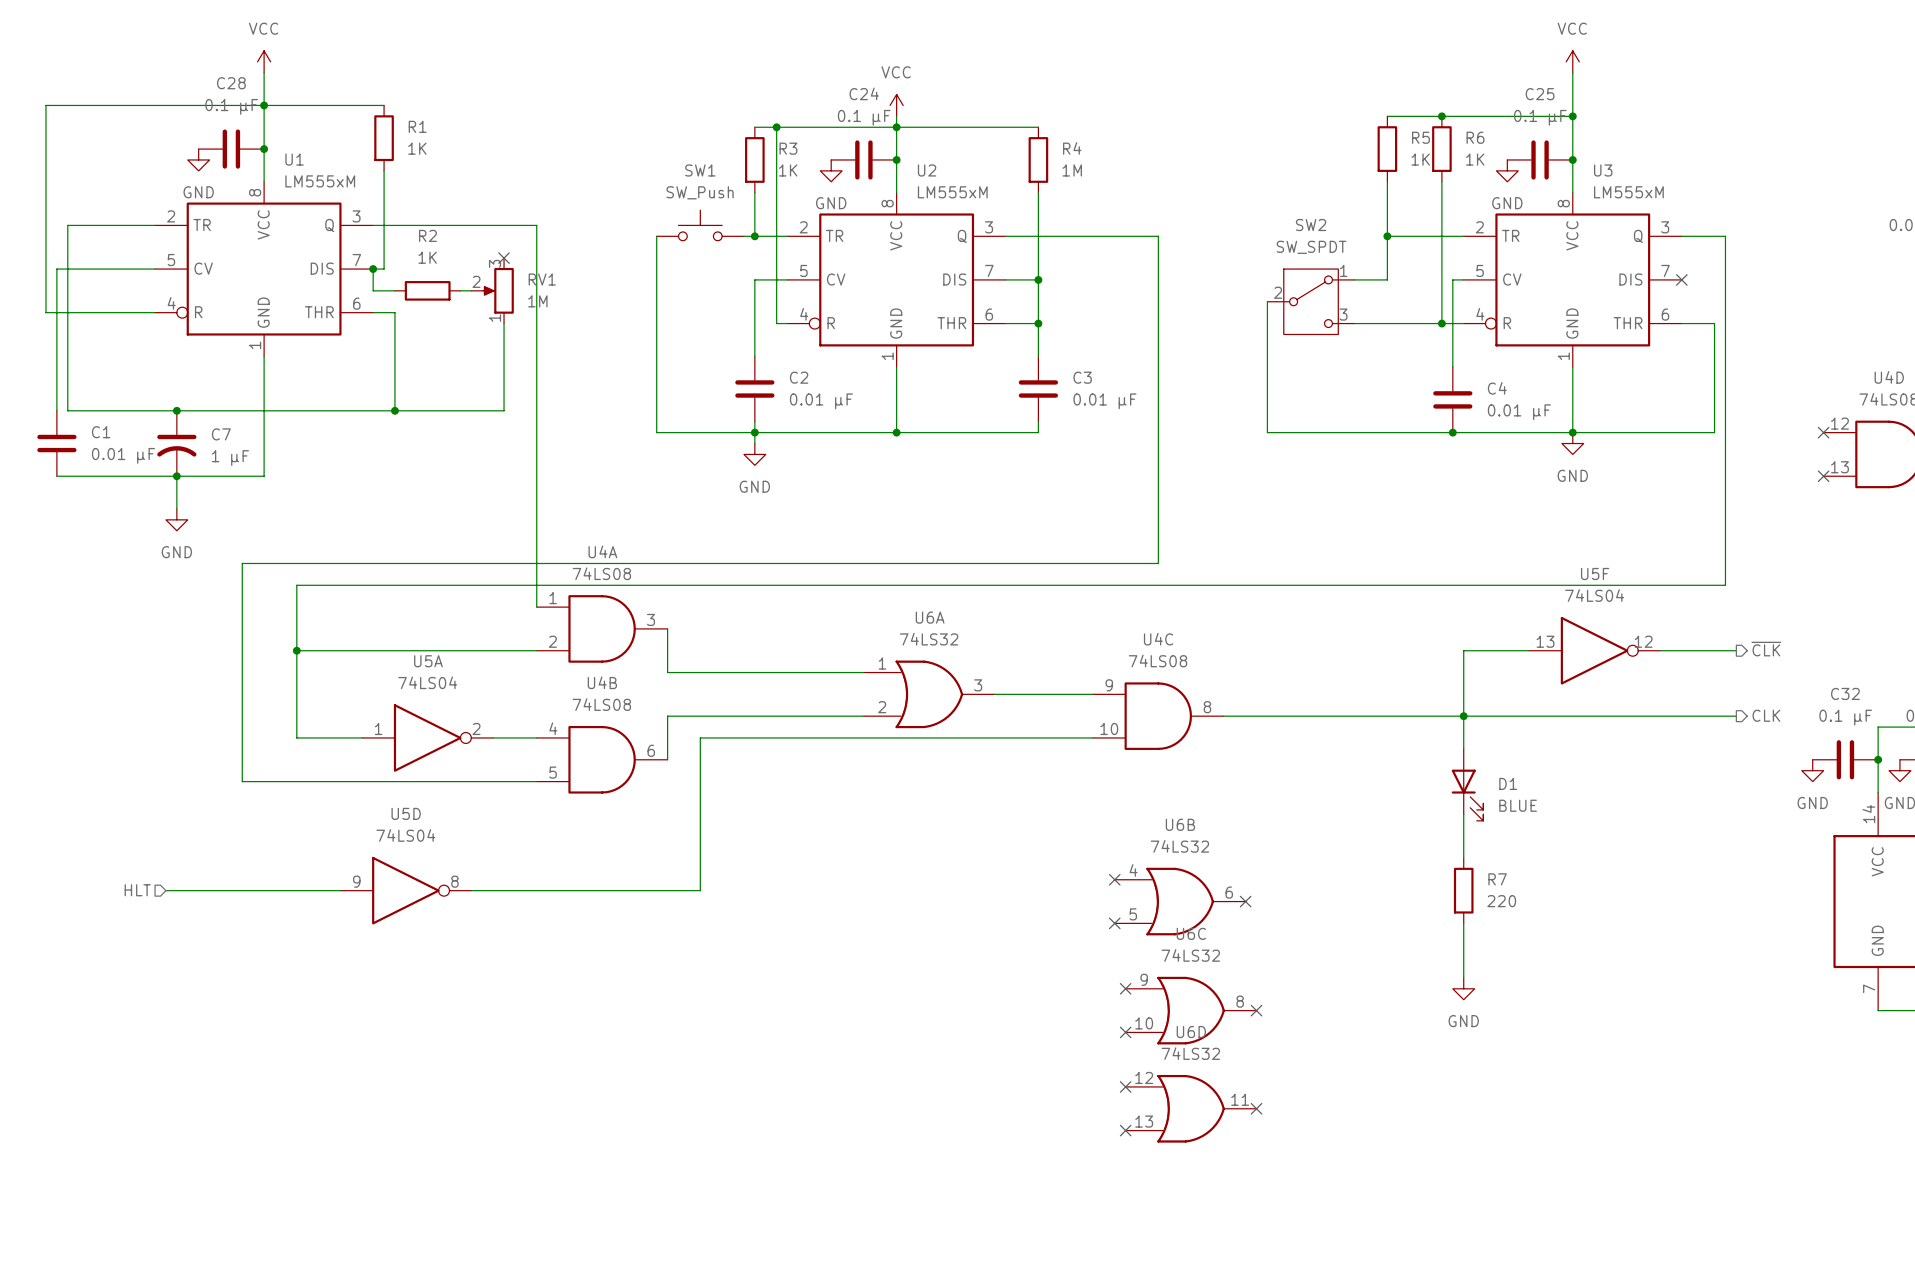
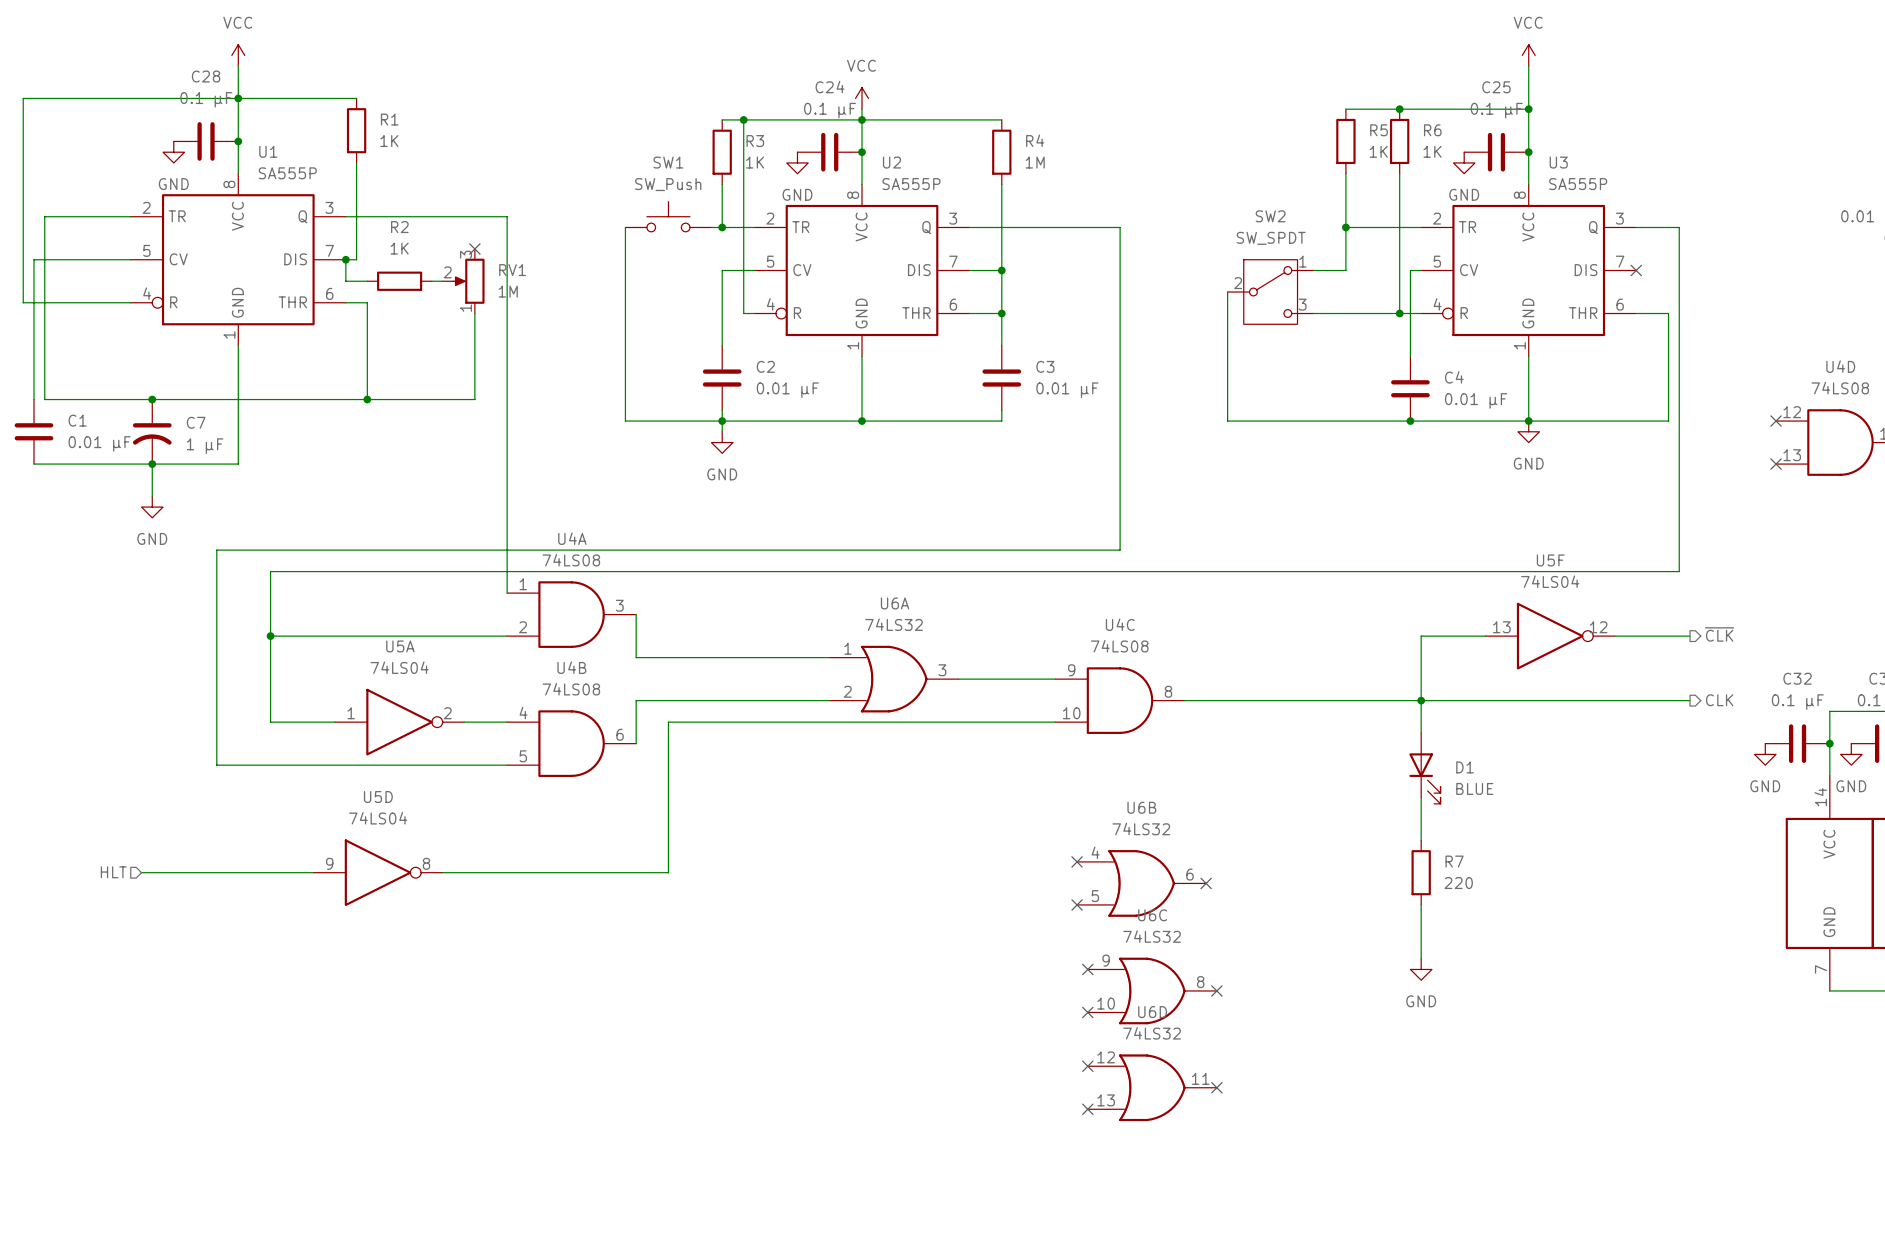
U1 value: LM555xM (320, 181) -> SA555P (287, 173)
U2 value: LM555xM (952, 192) -> SA555P (911, 184)
U3 value: LM555xM (1628, 192) -> SA555P (1578, 184)

